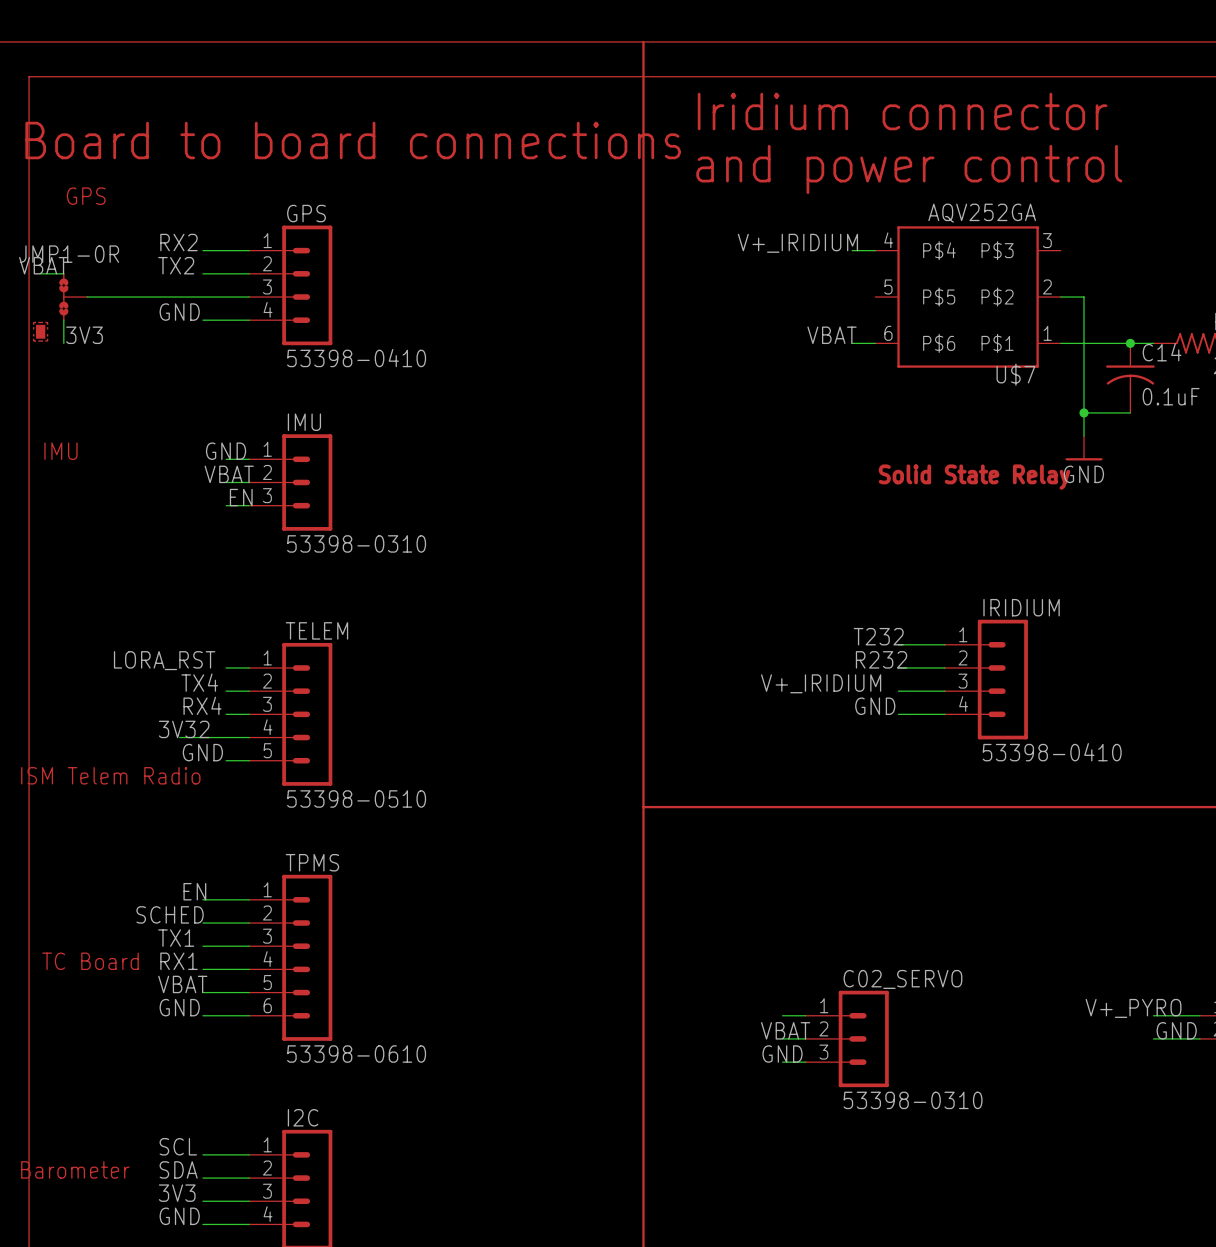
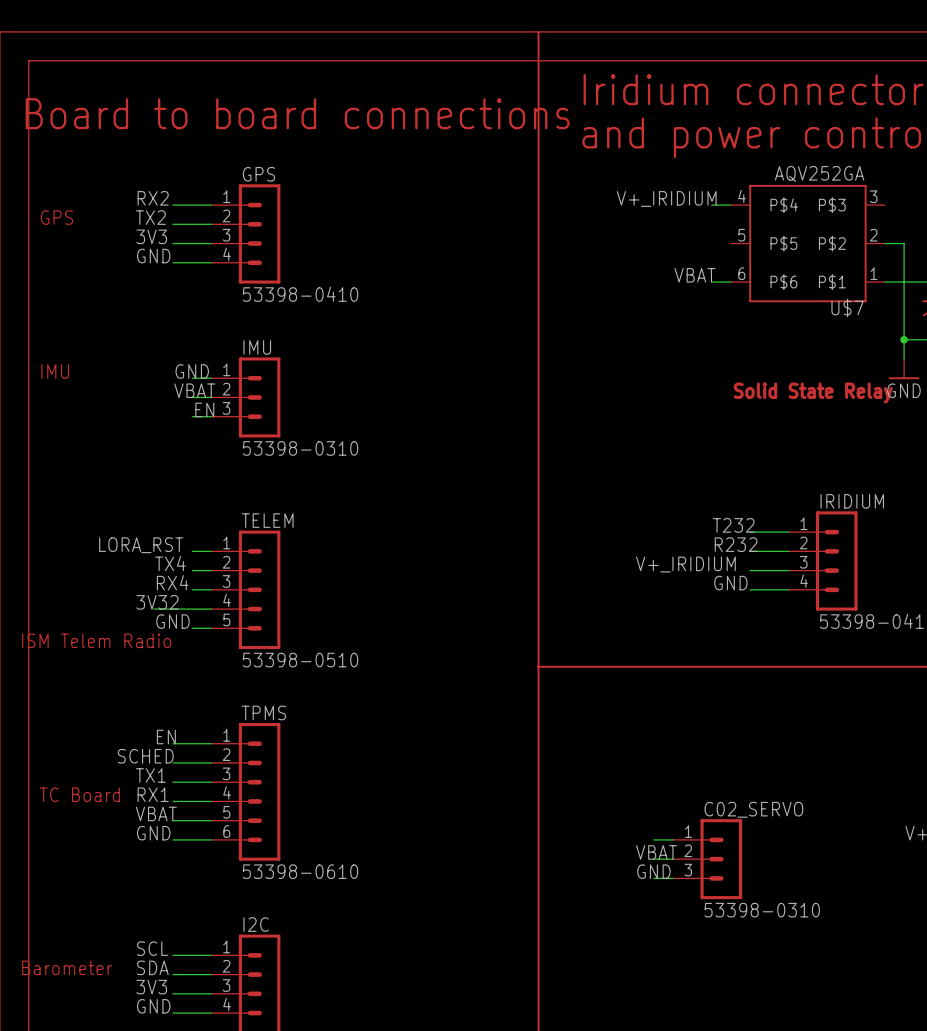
text position: GPS (86, 196) -> GPS (56, 217)
label: VBAT (43, 265) -> none
wire: (40, 273) (63, 273) -> none
JMP1-0R: (73, 297) -> none
wire: (87, 297) (202, 297) -> none
wire: (63, 320) (63, 343) -> none
part: (40, 331) -> none
label position: 3V3 (84, 335) -> 3V3 (151, 236)

